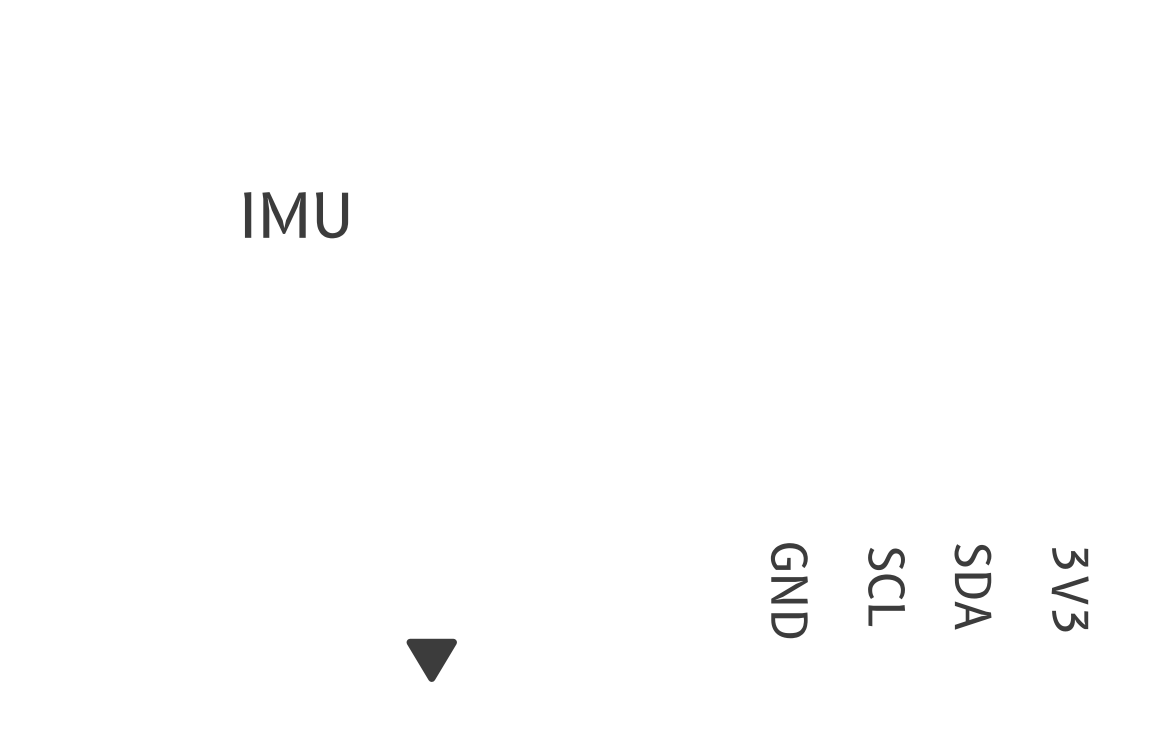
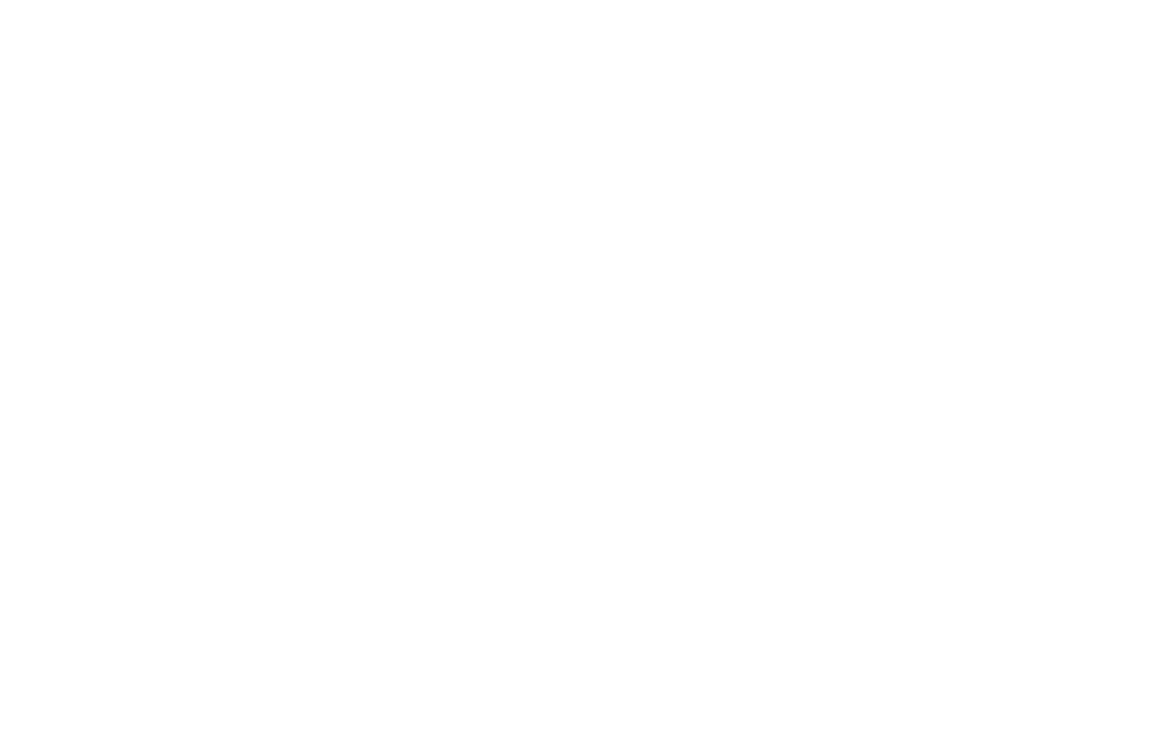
text: IMU (296, 215) -> none
text: SDA (972, 586) -> none
text: SCL (886, 587) -> none
text: 3V3 (1070, 589) -> none
text: GND (789, 590) -> none
drawing: [406, 638, 457, 682] -> none

